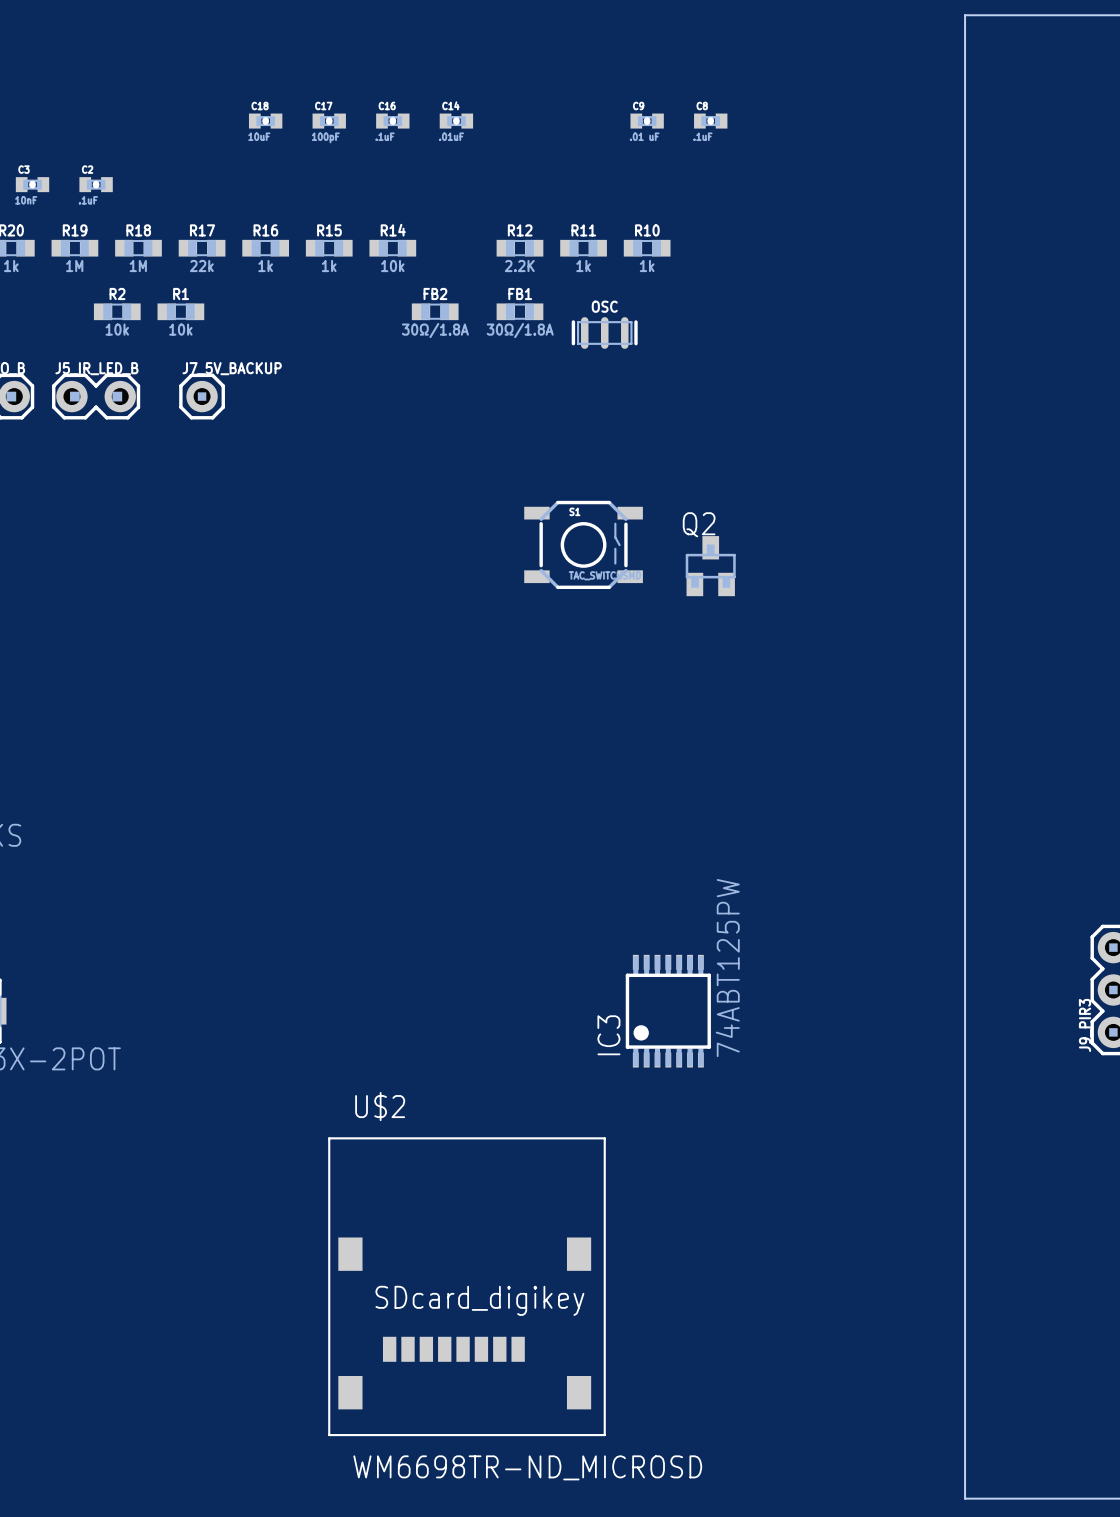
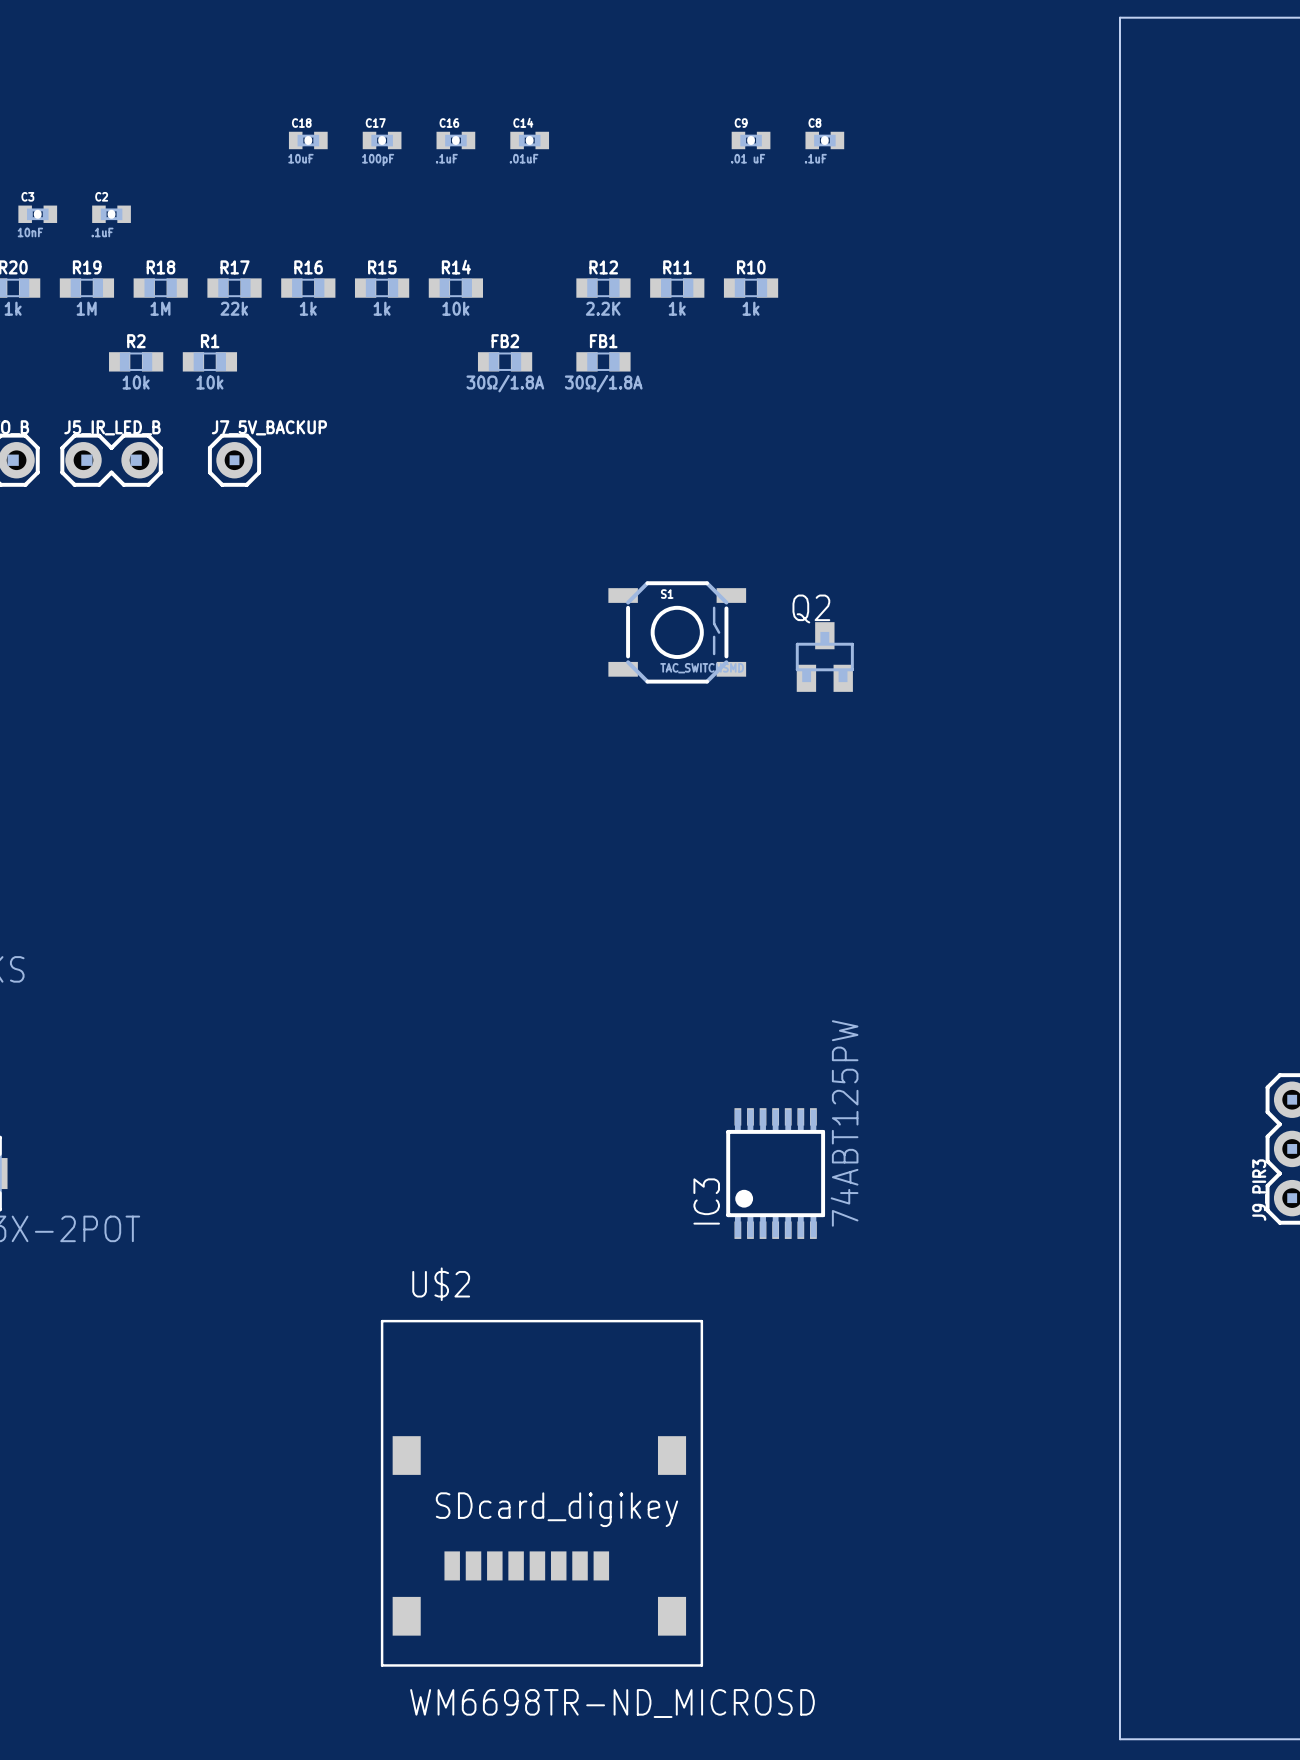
OSC: (604, 332) -> none

